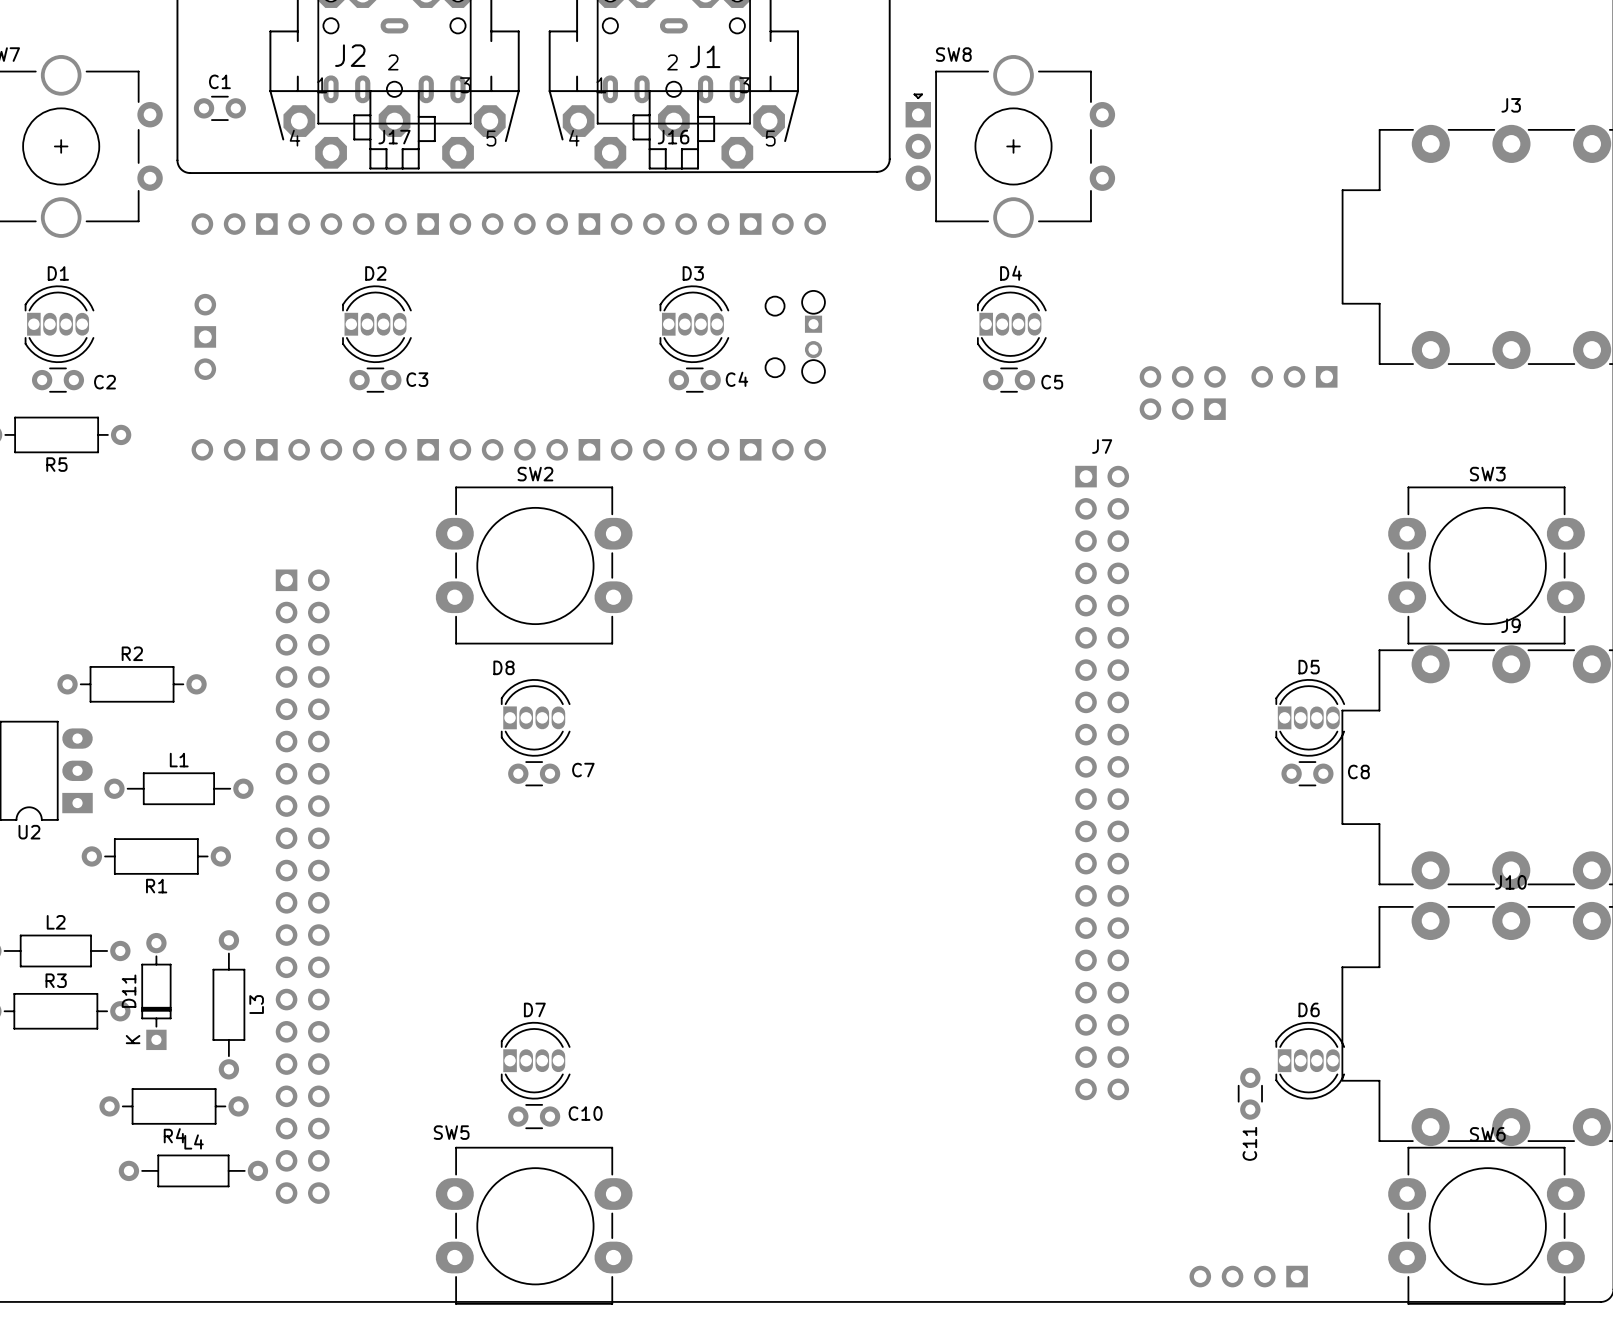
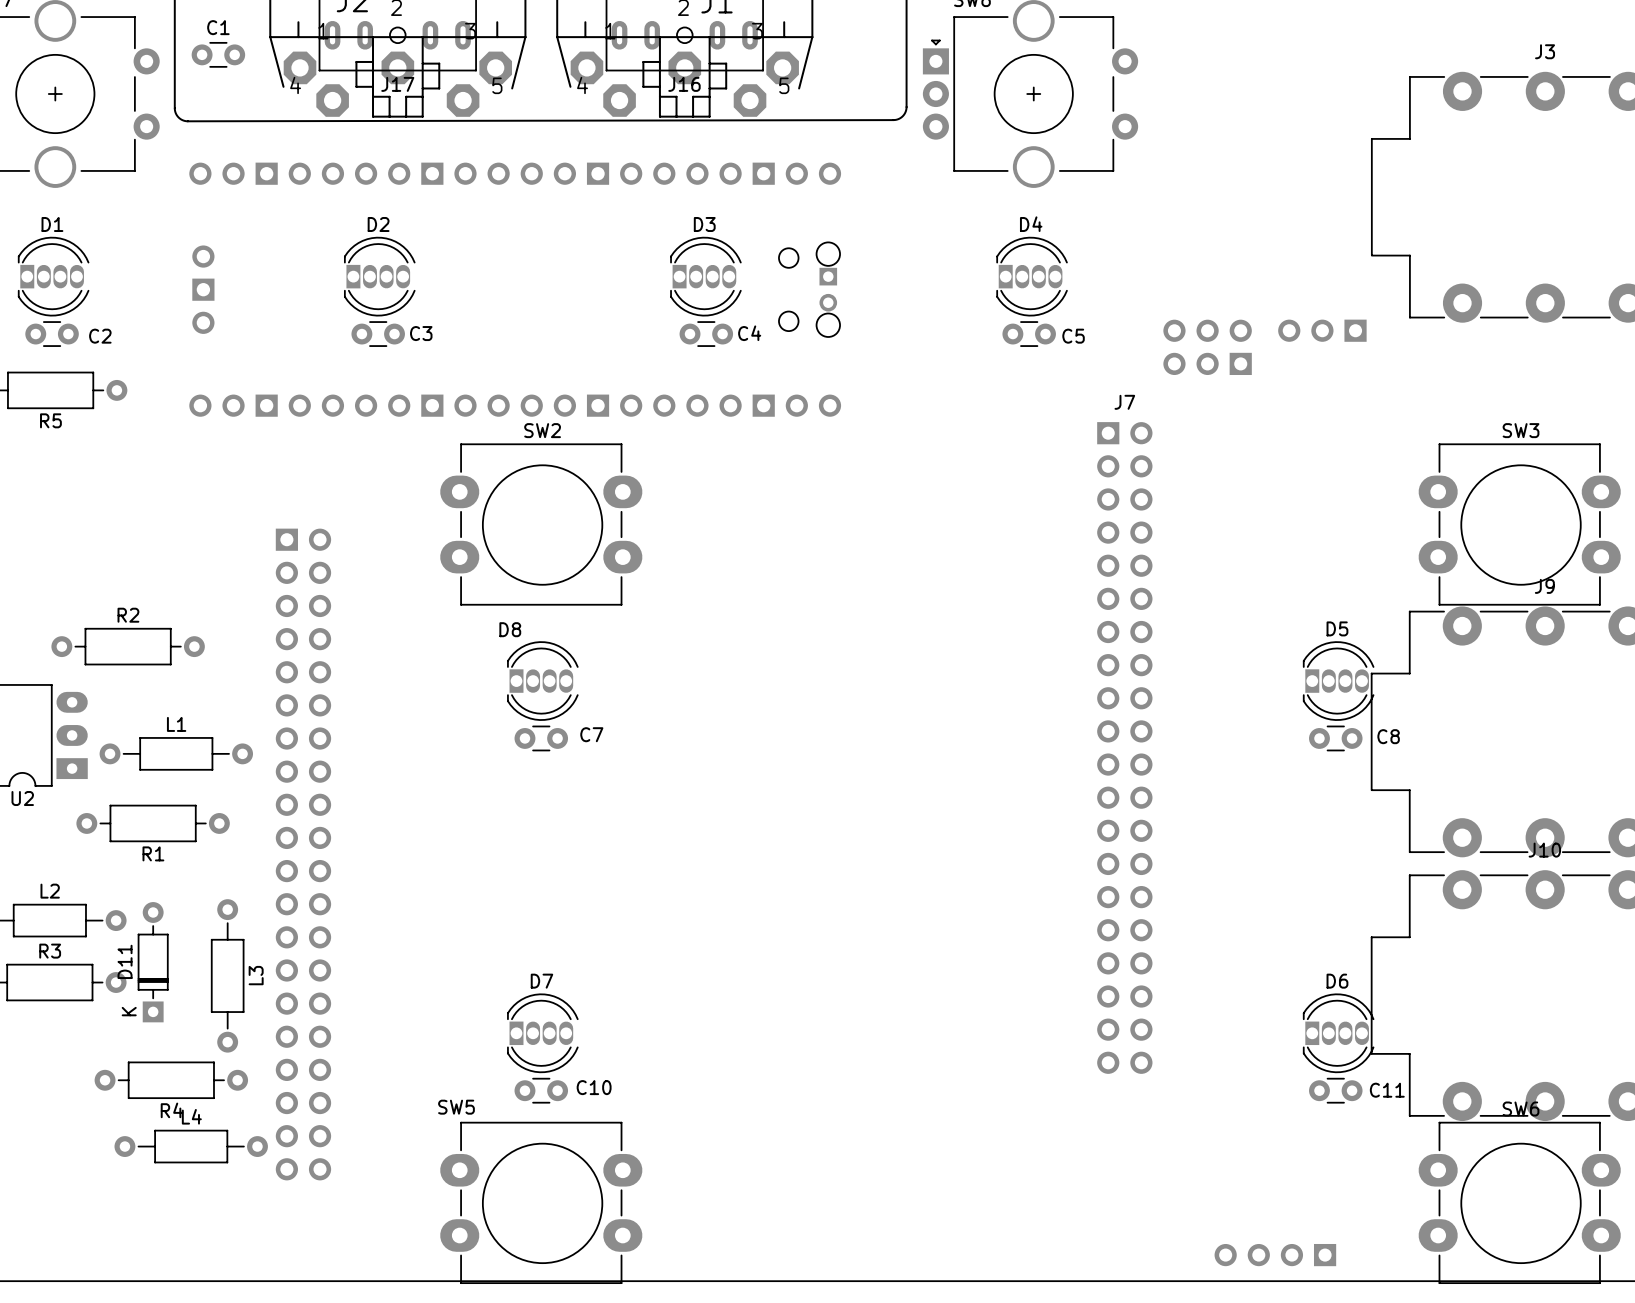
C11 rotation: 0° (1250, 1093) -> 90° clockwise (1335, 1090)
C11 position: (1250, 1093) -> (1335, 1090)
C11 name position: C11 (1249, 1143) -> C11 (1387, 1090)

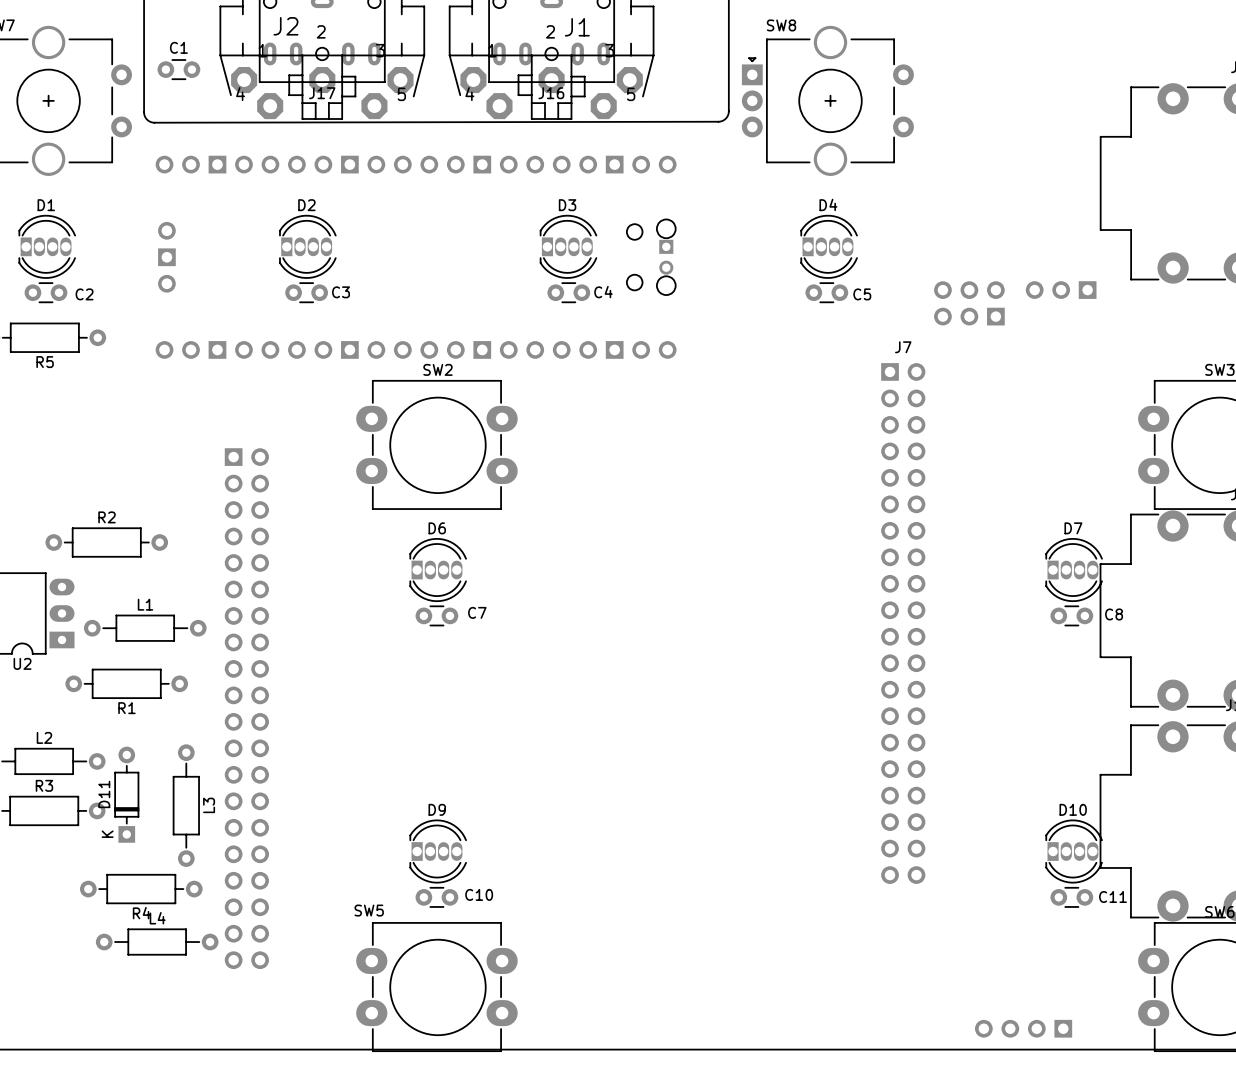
D5 name: D5 (1337, 628) -> D7 (1073, 528)
D8 name: D8 (510, 629) -> D6 (437, 528)
D7 name: D7 (541, 981) -> D9 (437, 809)
D6 name: D6 (1337, 981) -> D10 (1073, 809)

